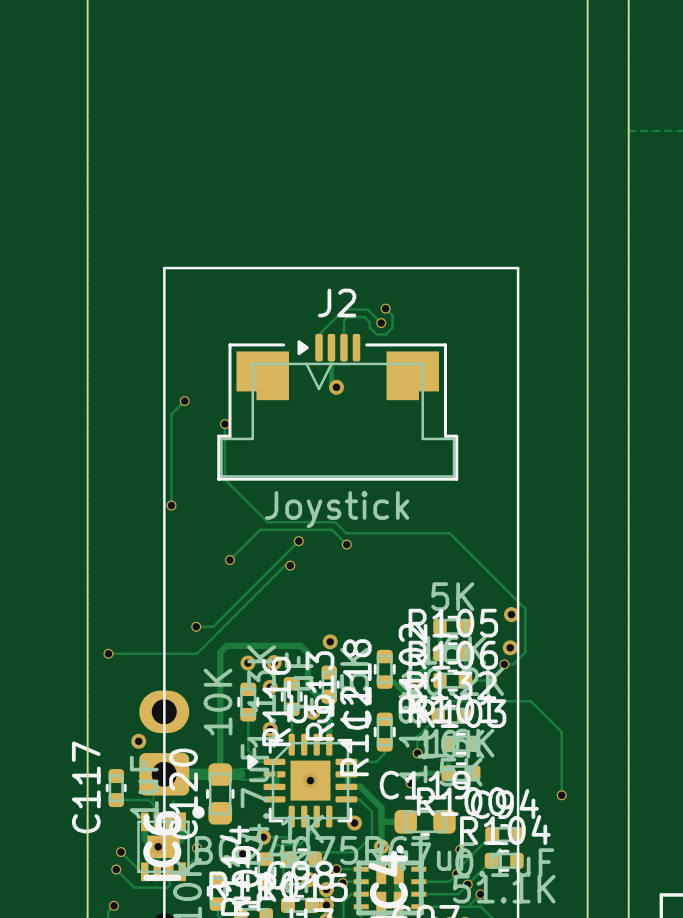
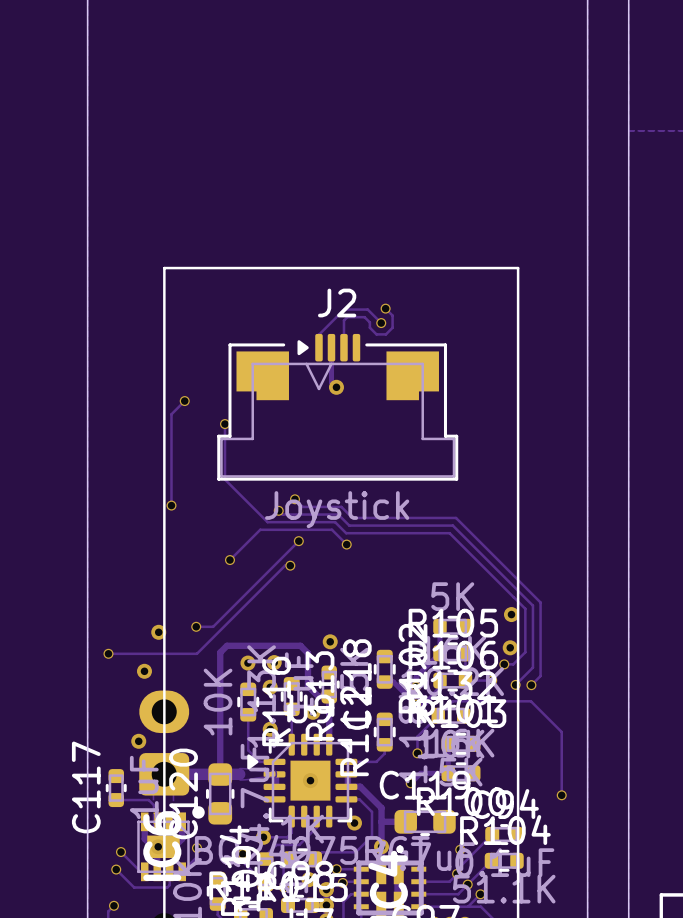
track: none -> (294, 499) (302, 506) (341, 506) (352, 517) (456, 517) (540, 602) (540, 676) (531, 685)
via: none -> (294, 499)
track: none -> (278, 510) (282, 514) (338, 514) (349, 525) (452, 525) (532, 605) (532, 667) (515, 684)
via: none -> (278, 510)
via: none -> (158, 632)
via: none -> (144, 671)
via: none -> (515, 684)
via: none -> (531, 685)

